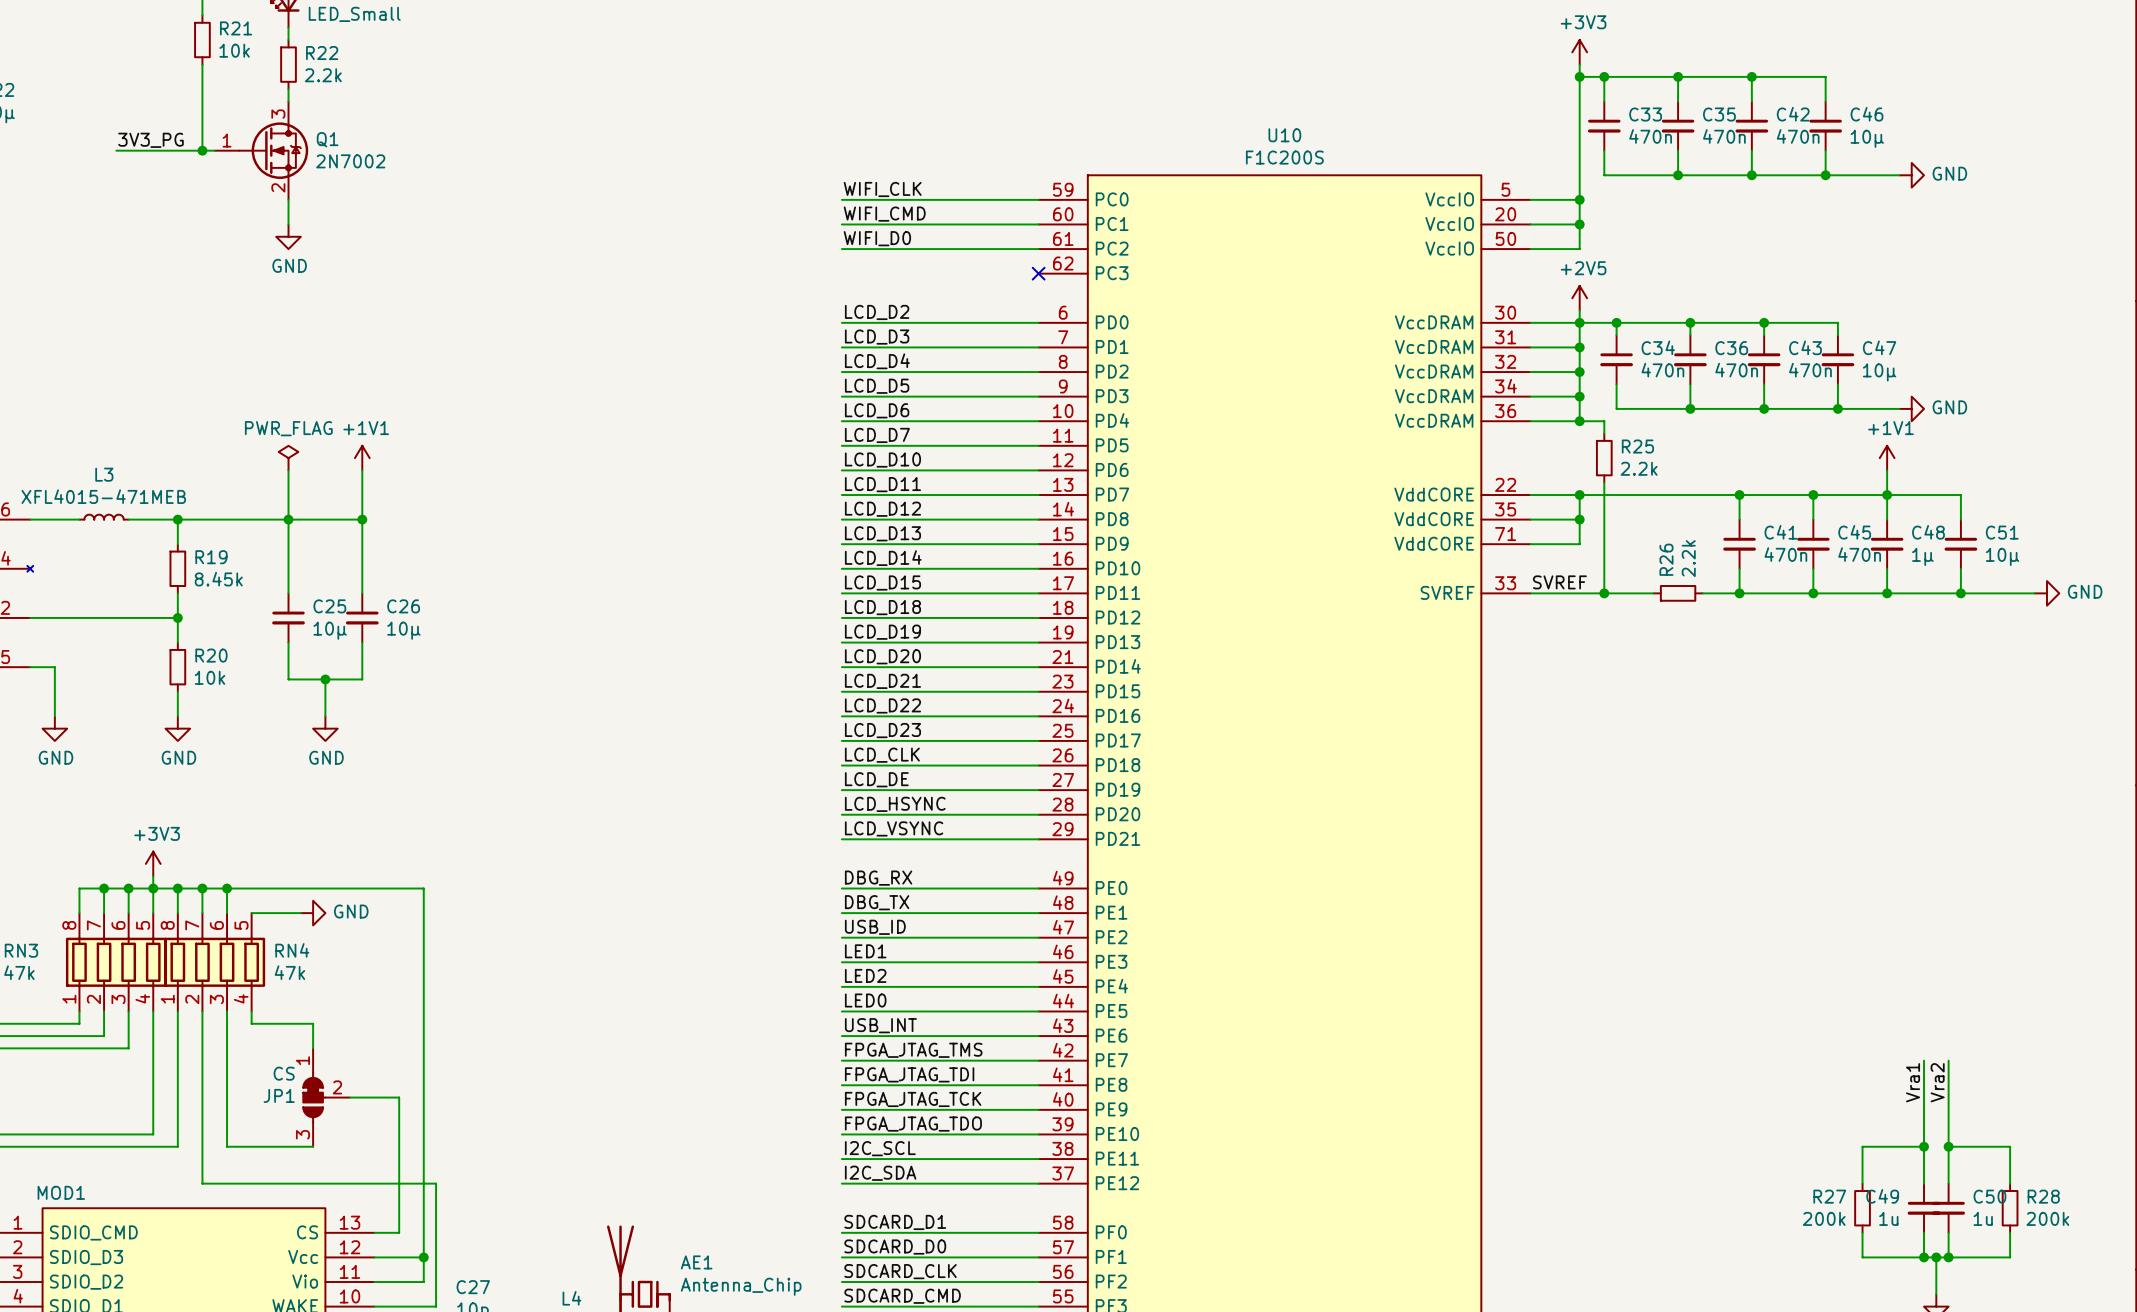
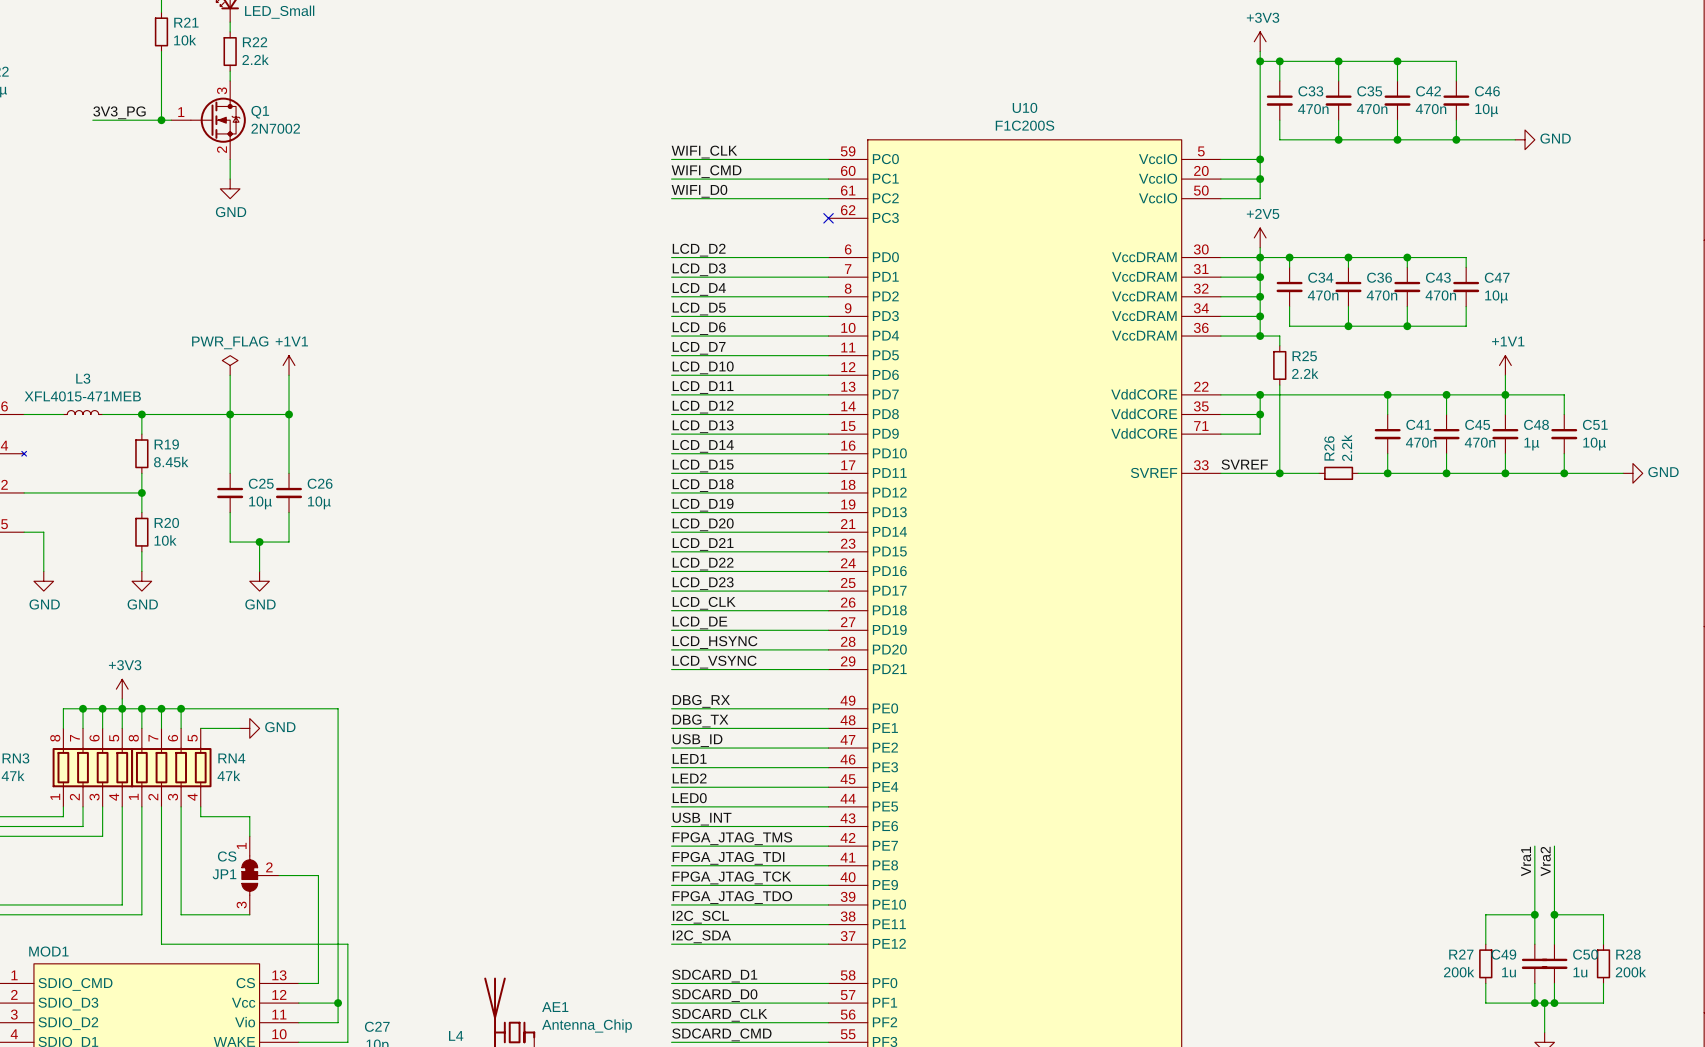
wire: (1837, 408) (1899, 408) -> none
junction: (1837, 408) -> none
power symbol: GND (1911, 408) -> none

